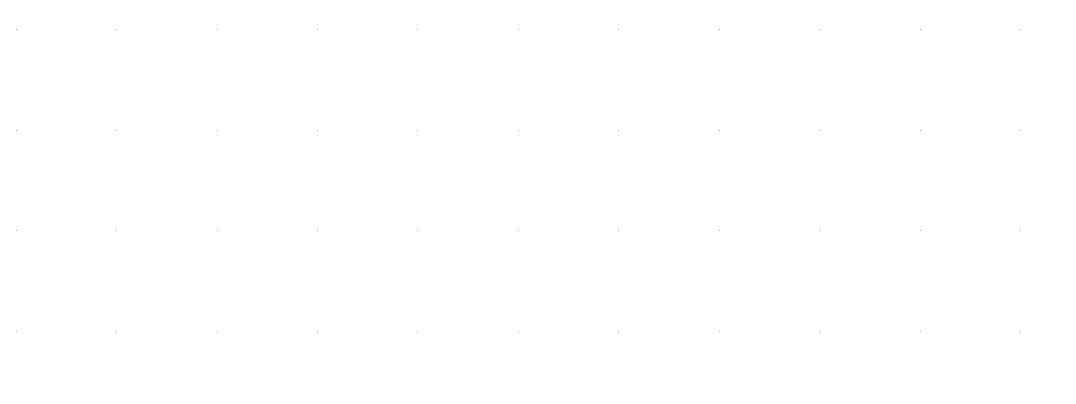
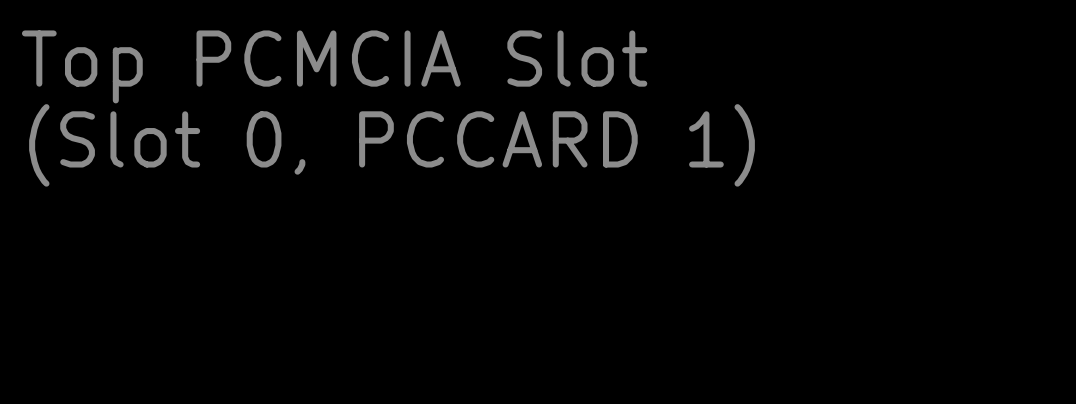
text: none -> Top PCMCIA Slot (334, 66)
text: none -> (Slot 0, PCCARD 1) (392, 145)

